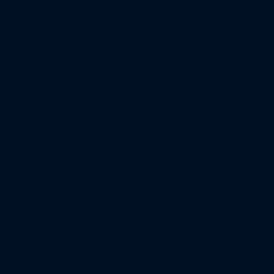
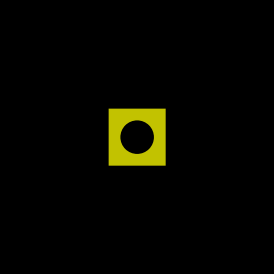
part: none -> (137, 137)

